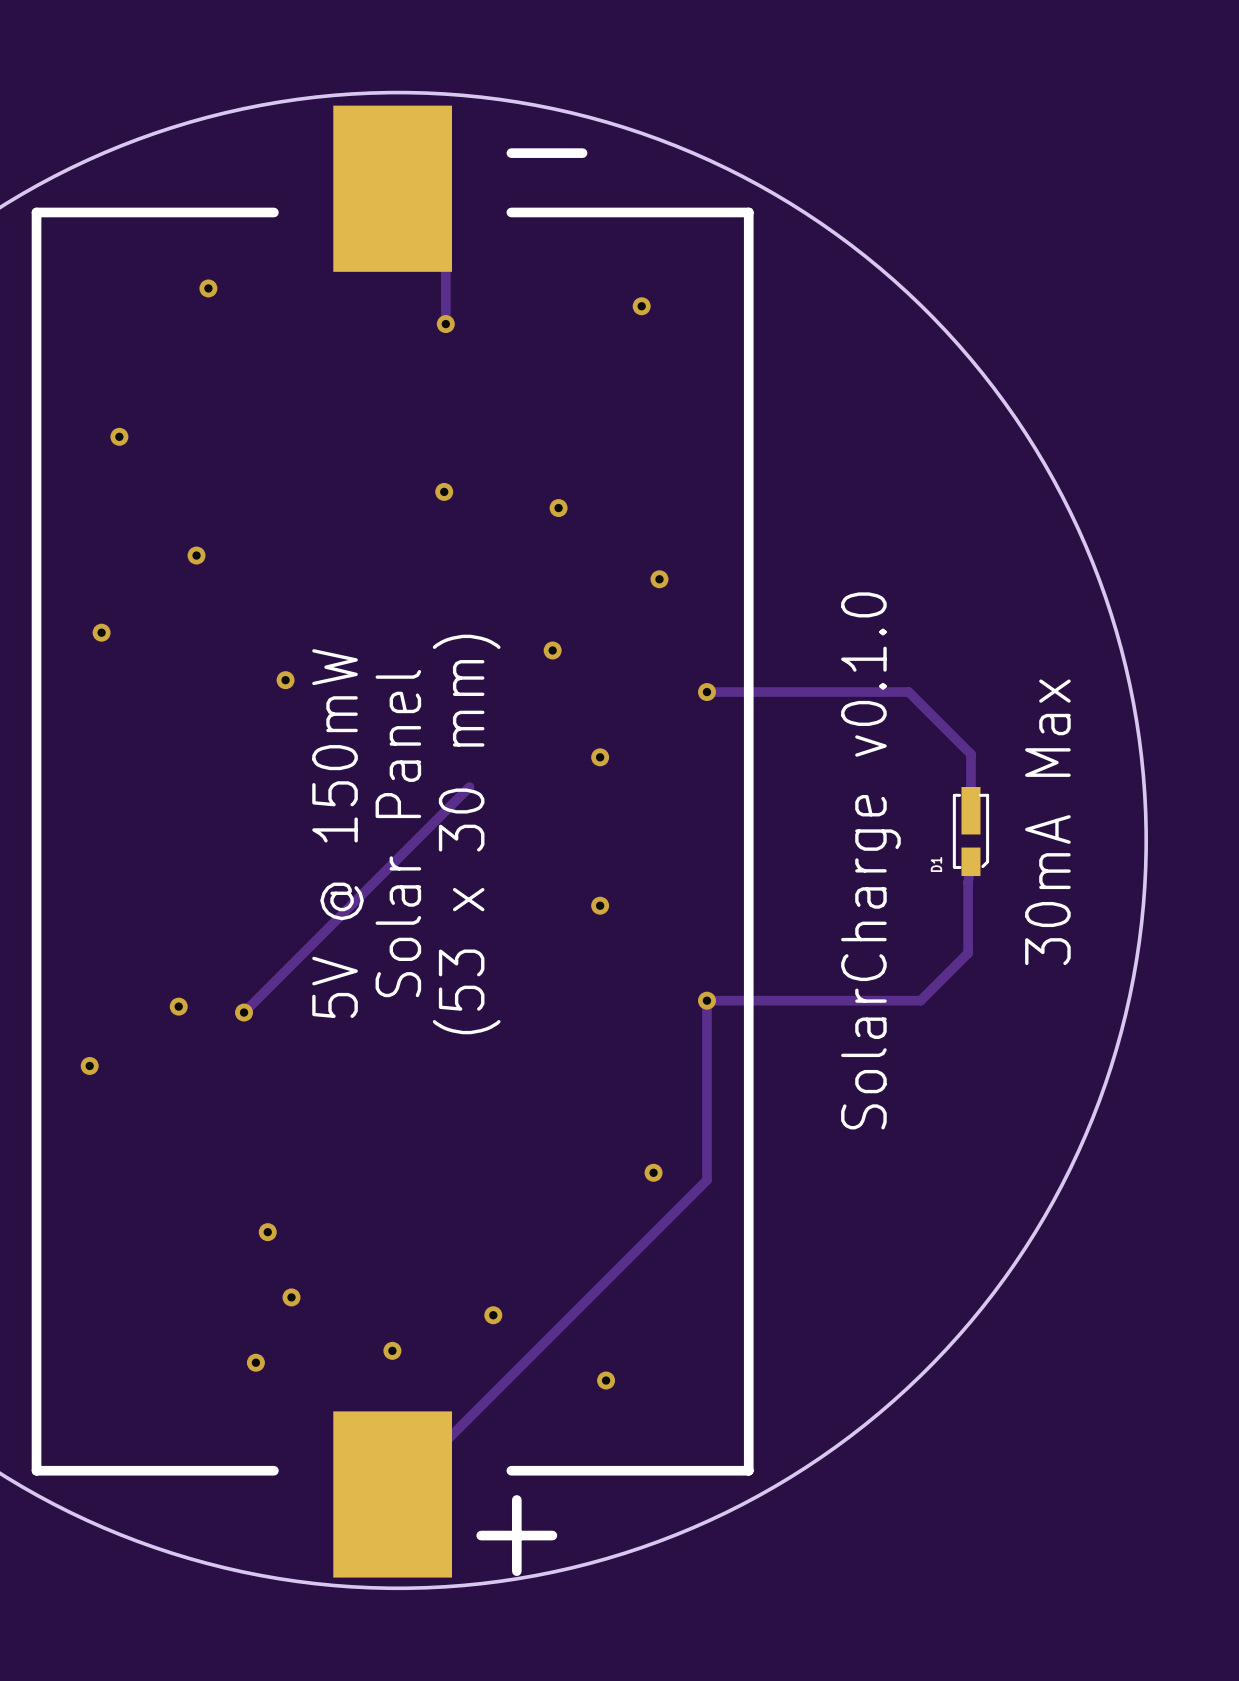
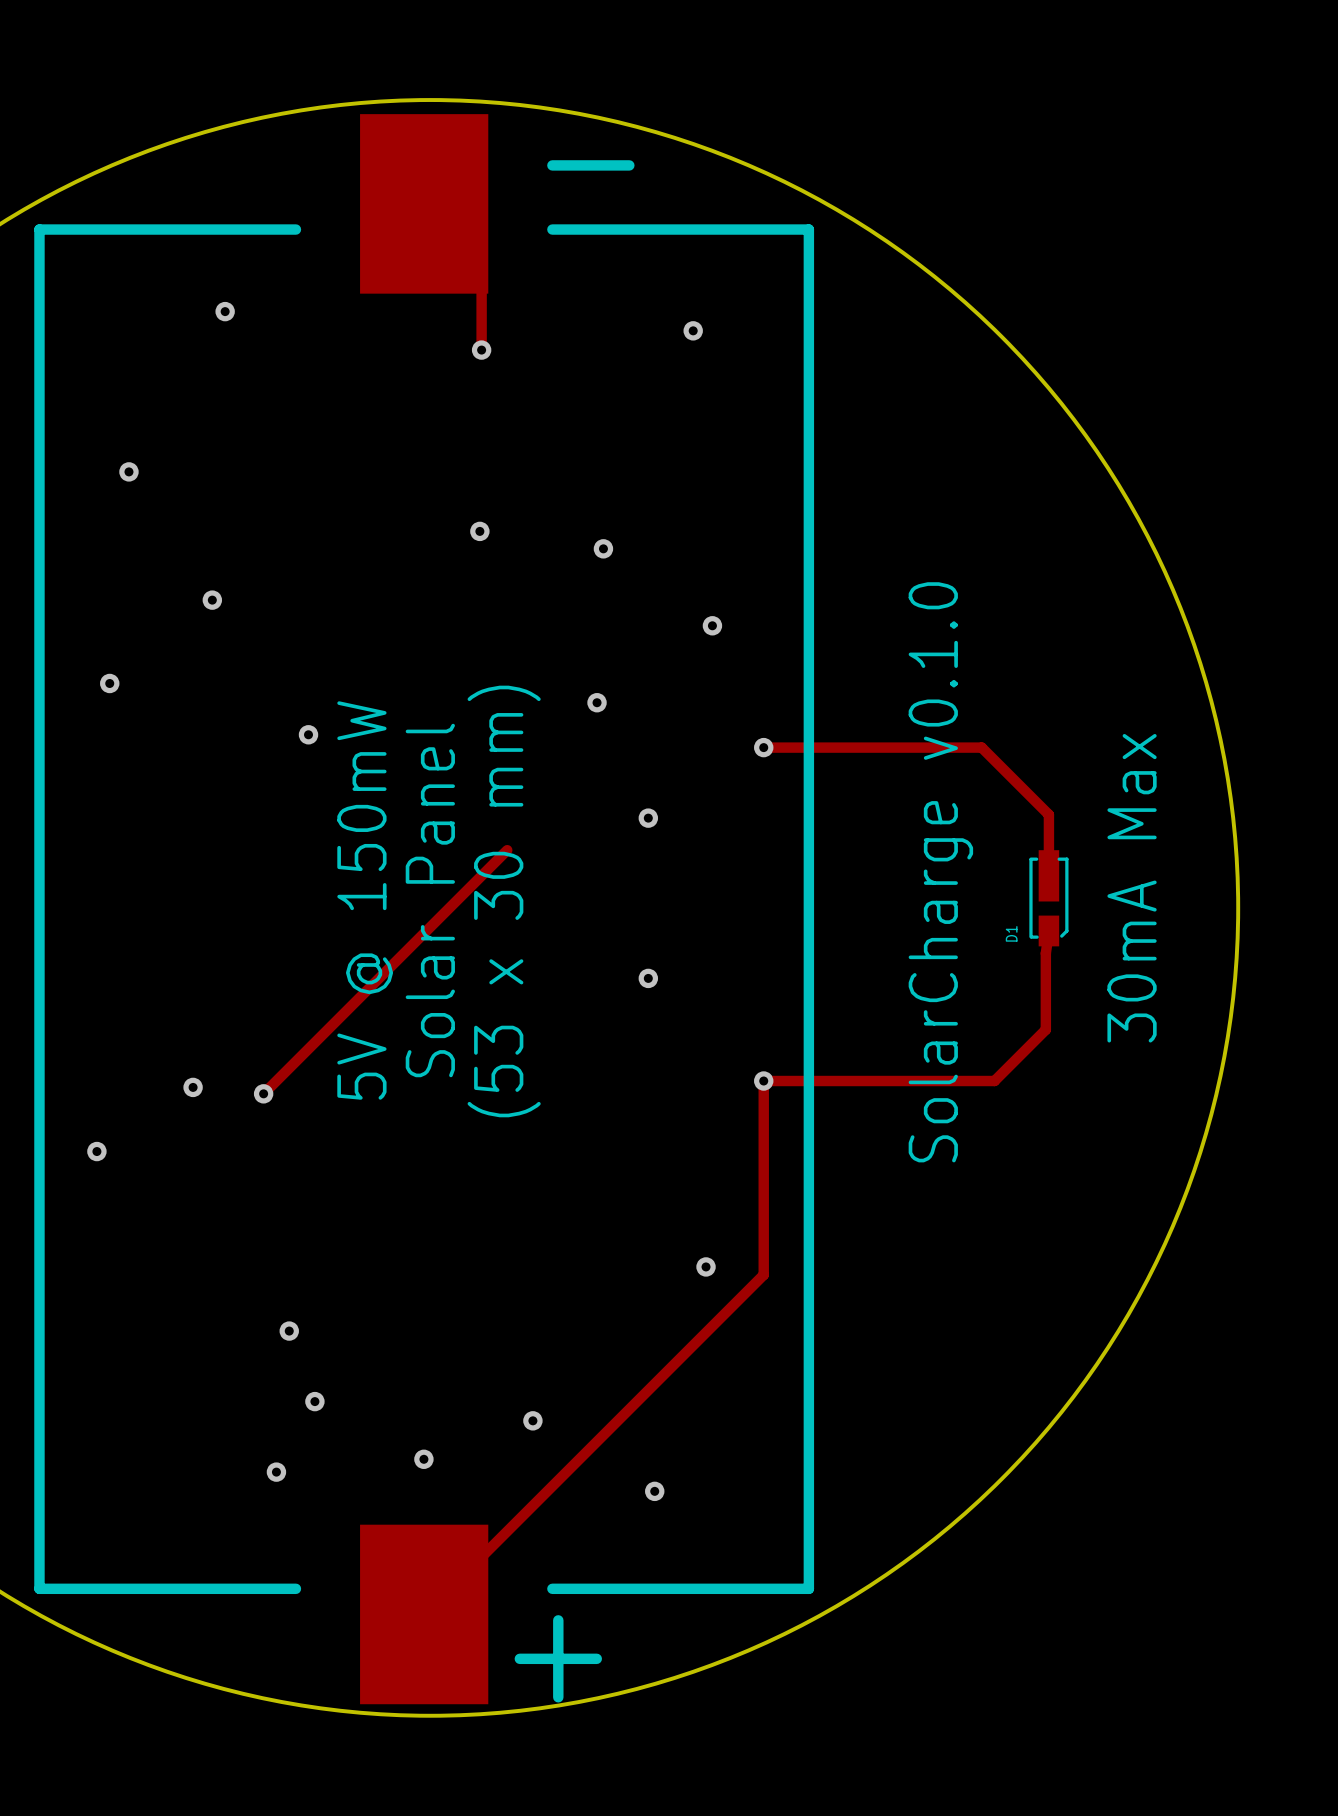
text position: SolarCharge v0.1.0 (870, 860) -> SolarCharge v0.1.0 (940, 872)

